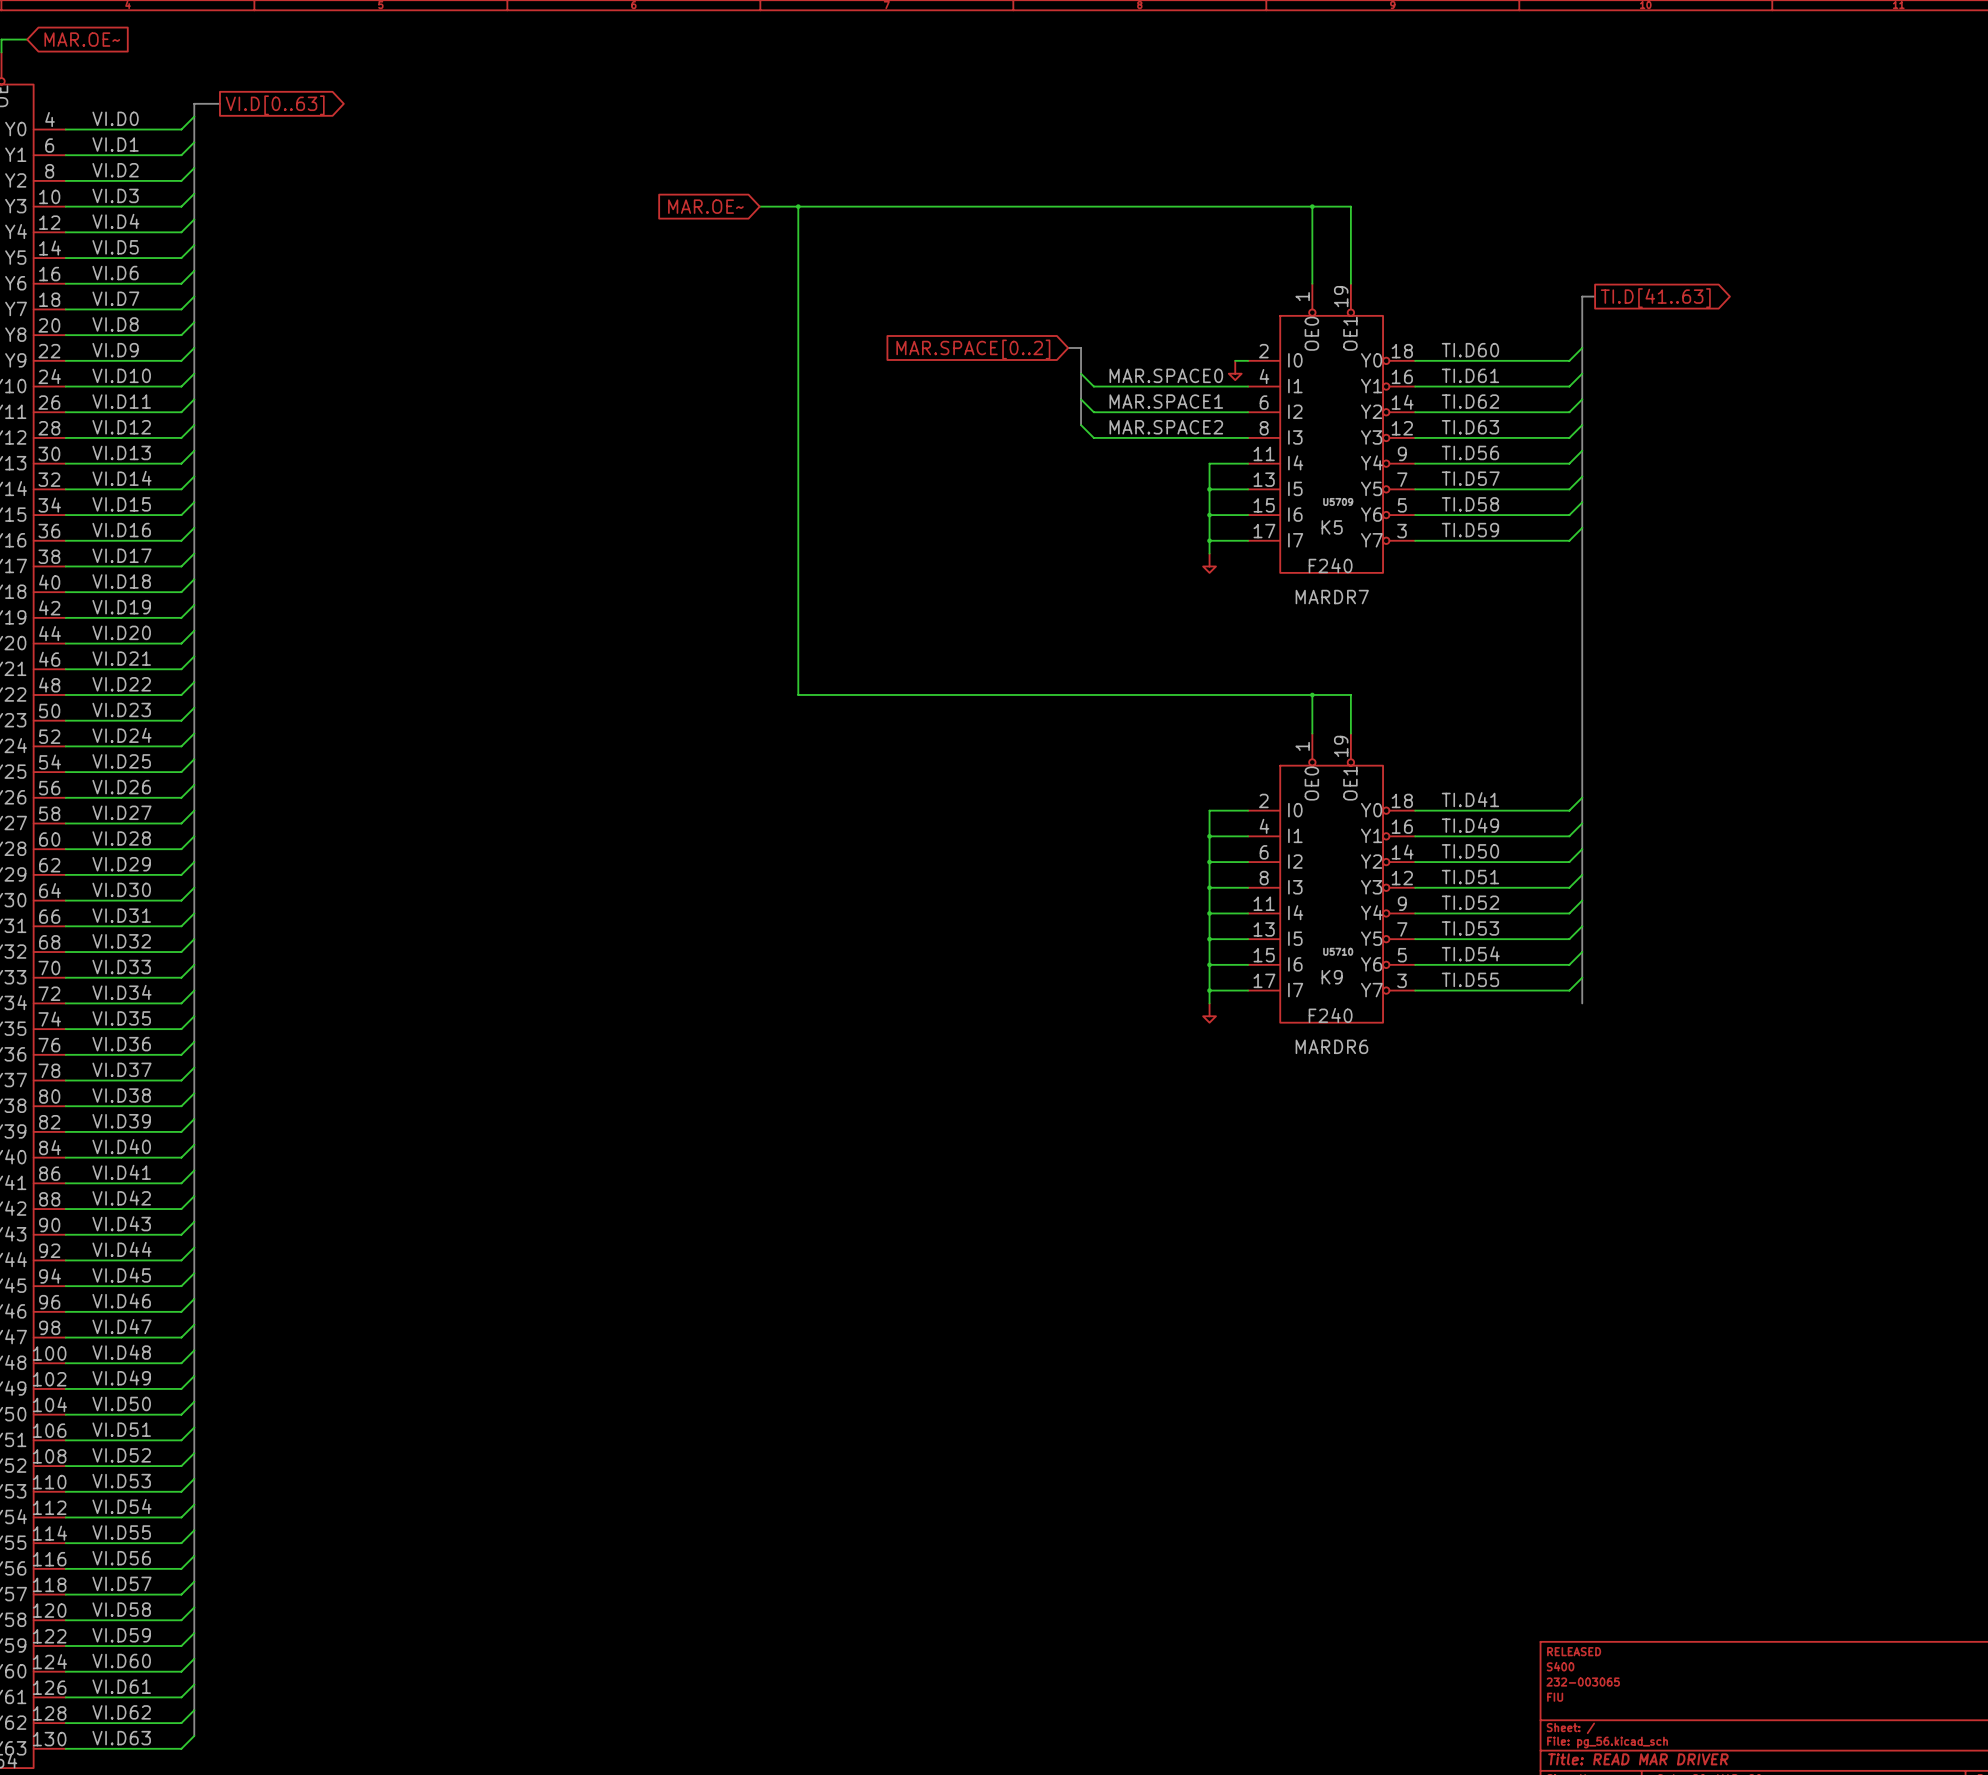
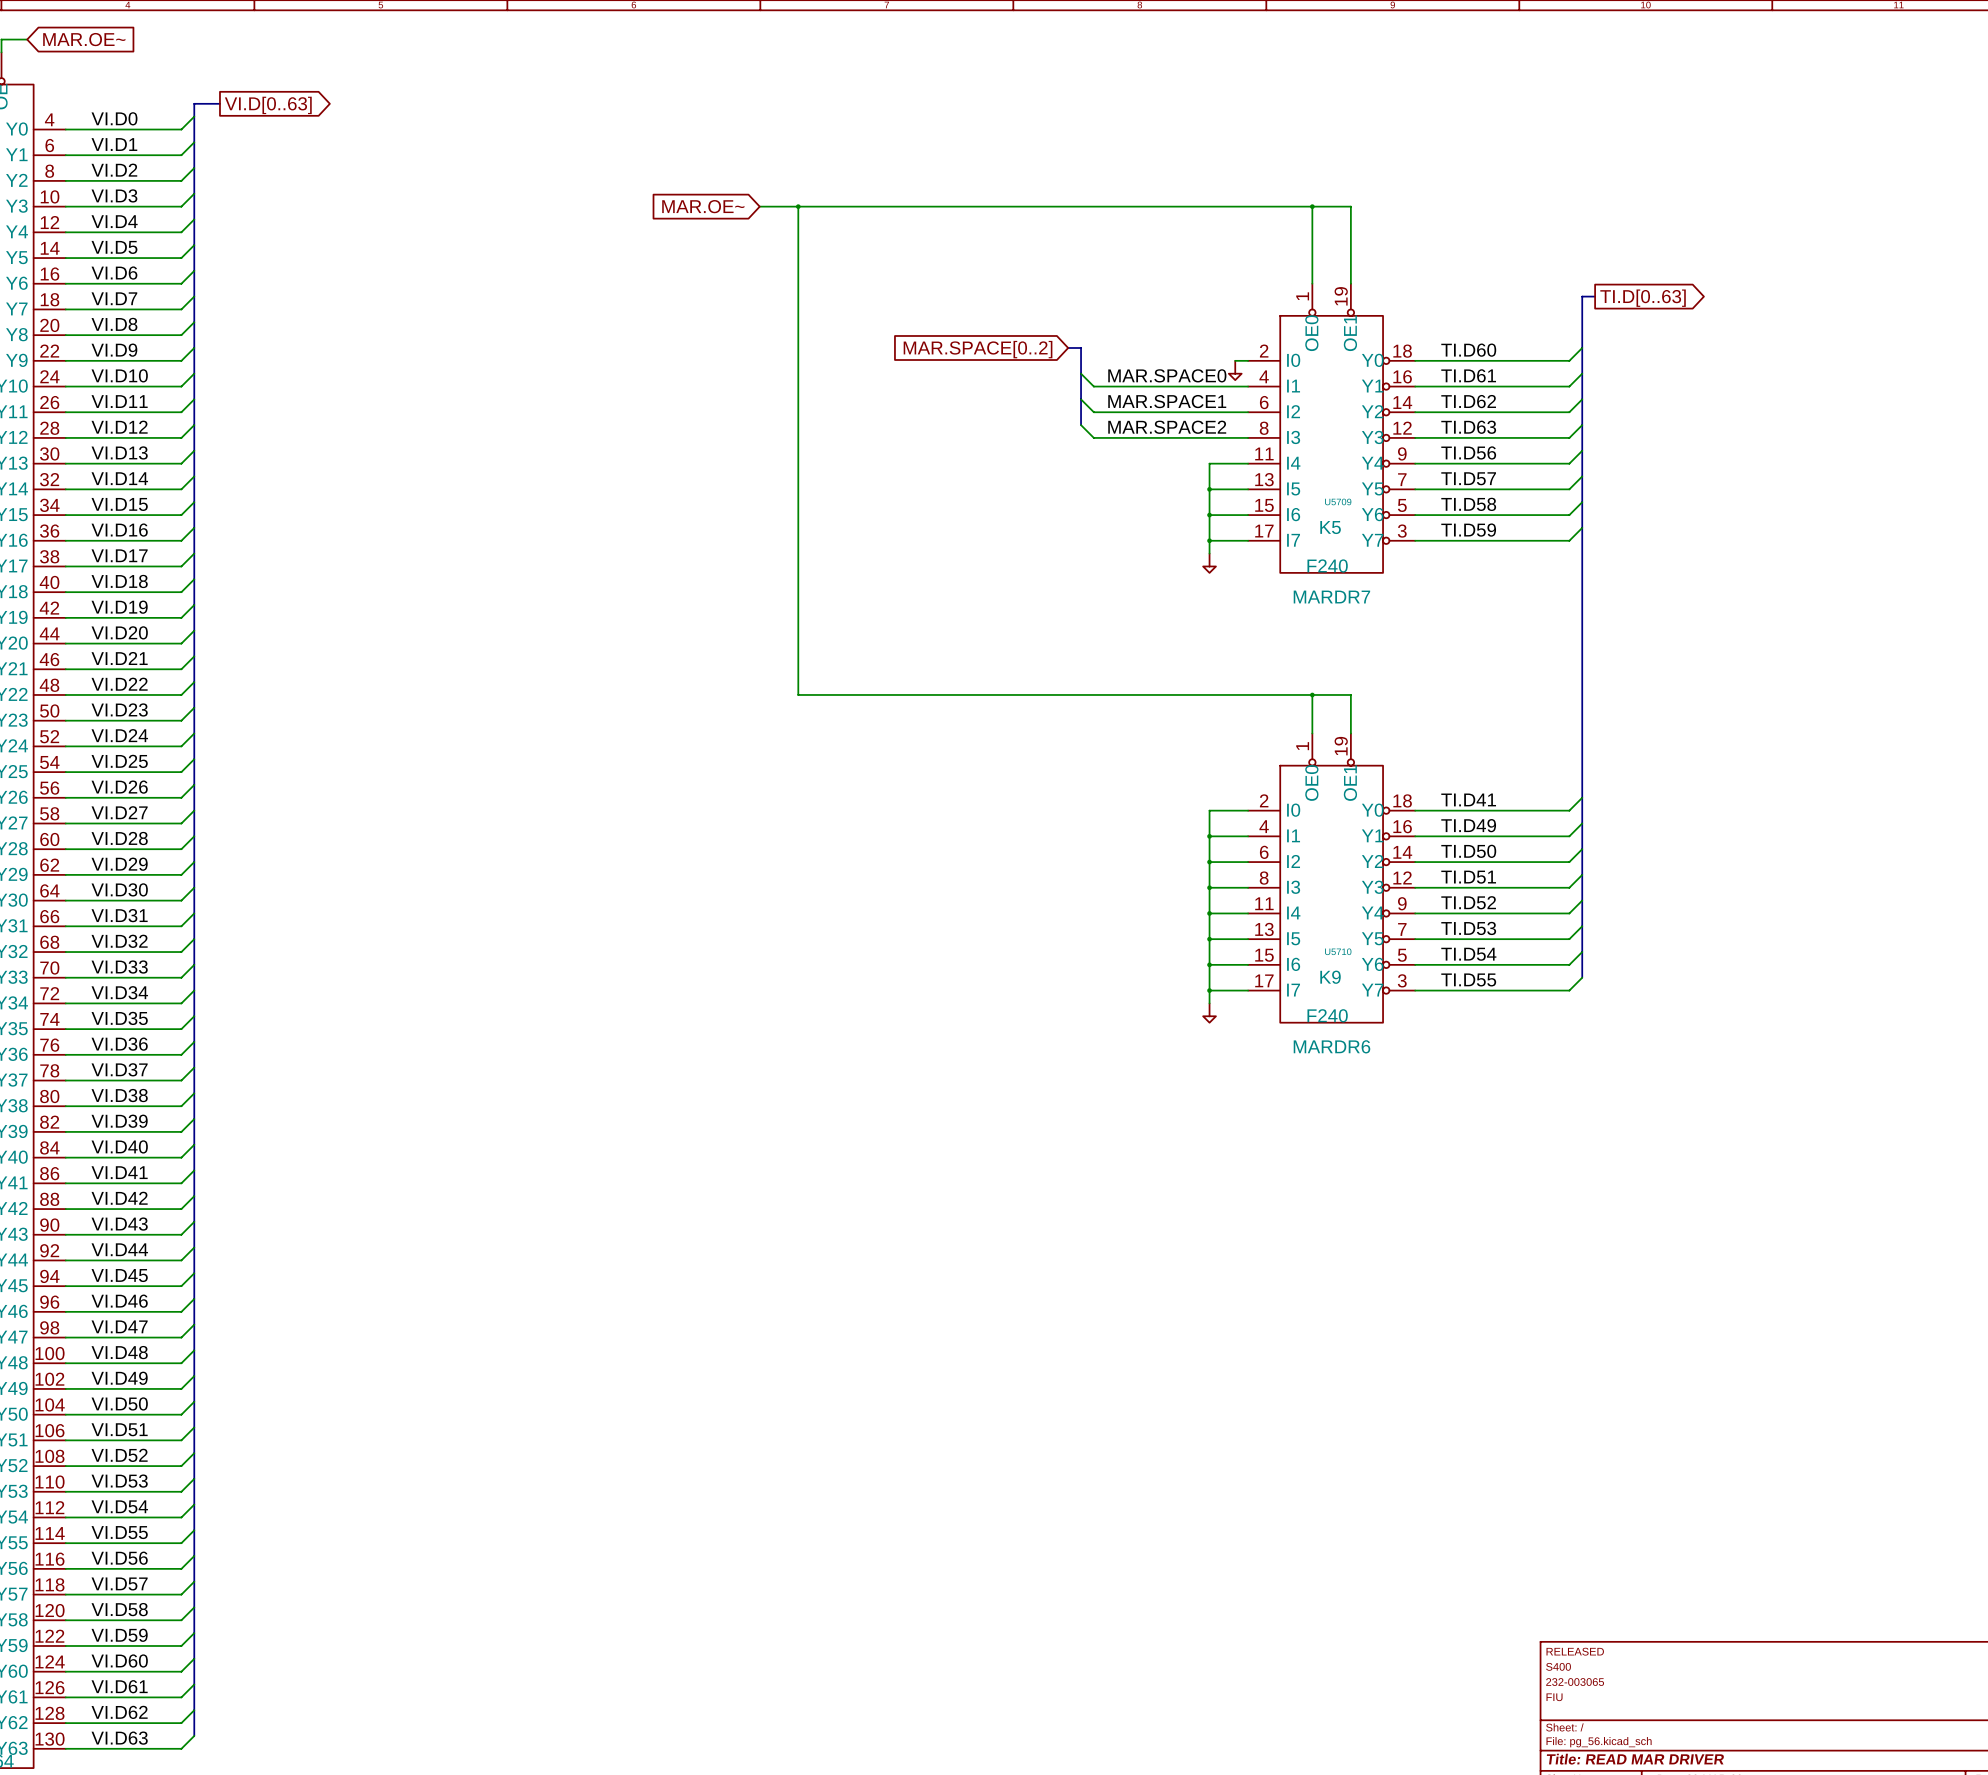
global label: TI.D[41..63] (1655, 298) -> TI.D[0..63] (1643, 298)
bus: (1582, 977) (1582, 1003) -> none

